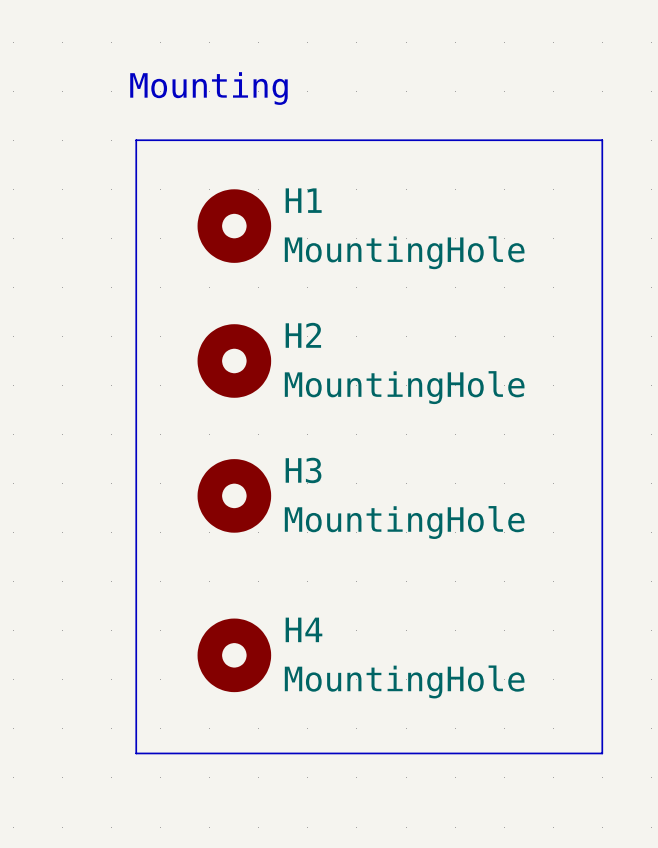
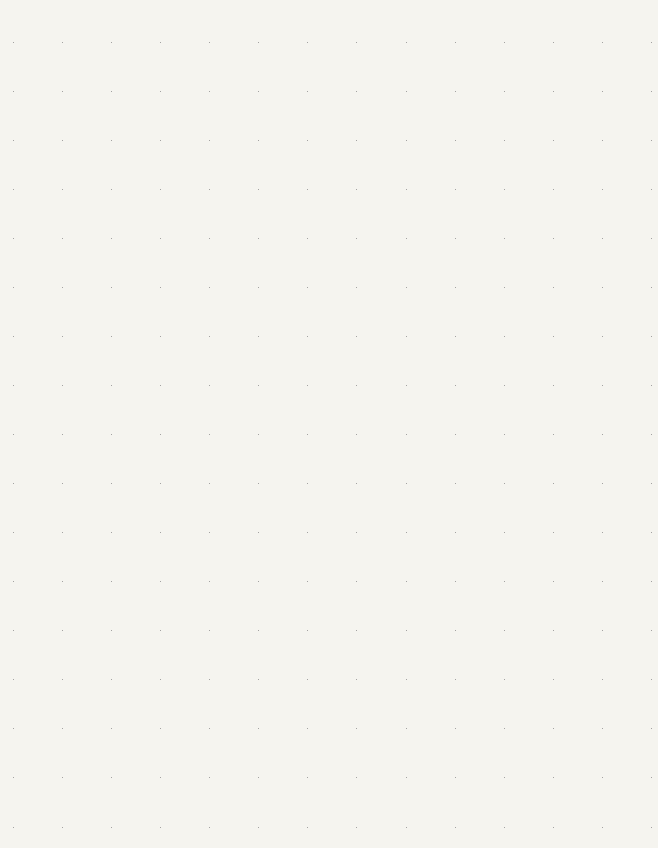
text: Mounting (208, 88) -> none
line: (136, 140) (602, 140) (602, 753) (136, 753) (136, 140) -> none
H1: MountingHole (234, 226) -> none
H2: MountingHole (234, 360) -> none
H3: MountingHole (234, 495) -> none
H4: MountingHole (234, 655) -> none

